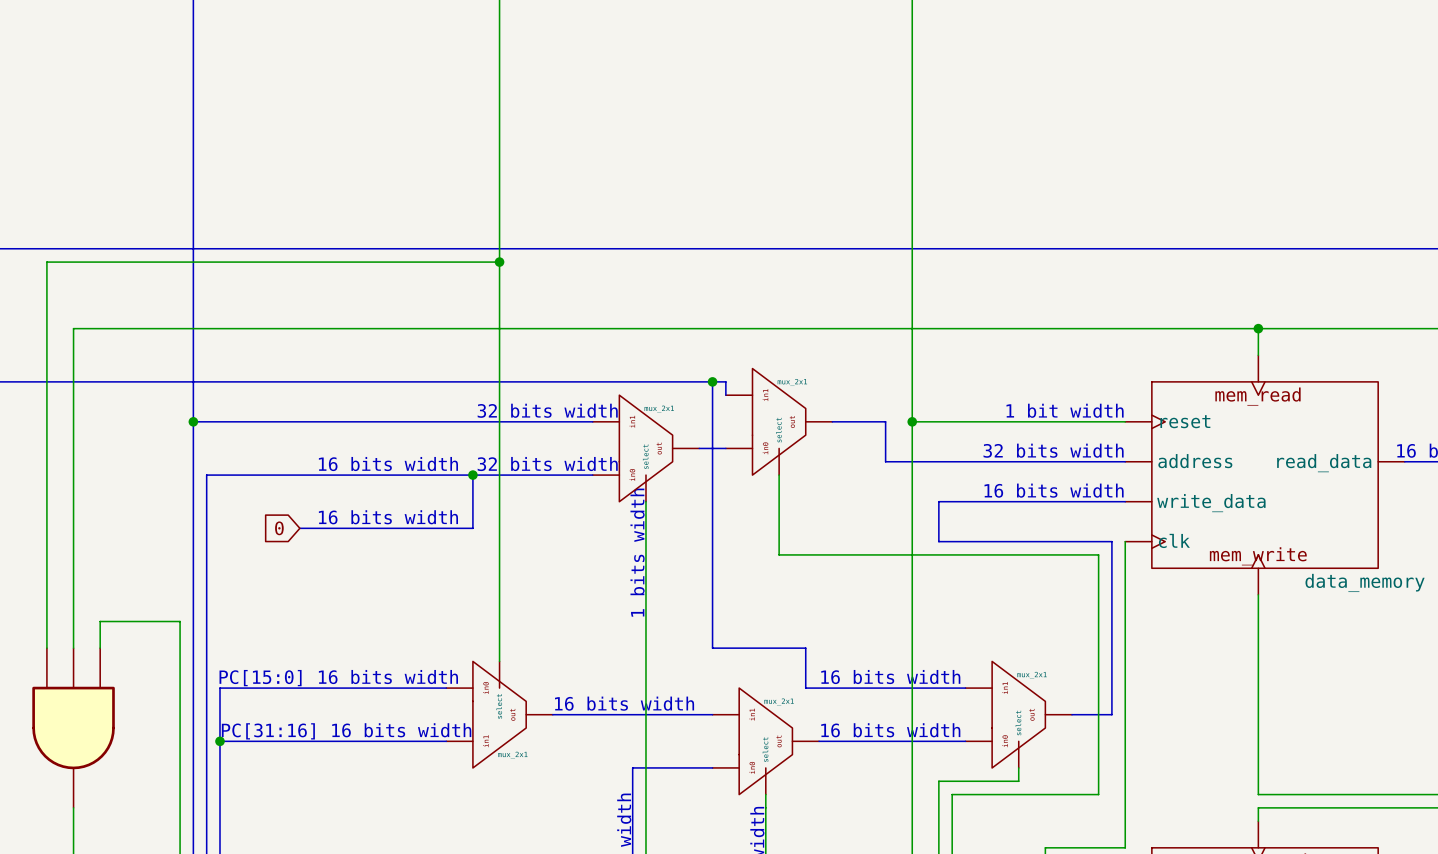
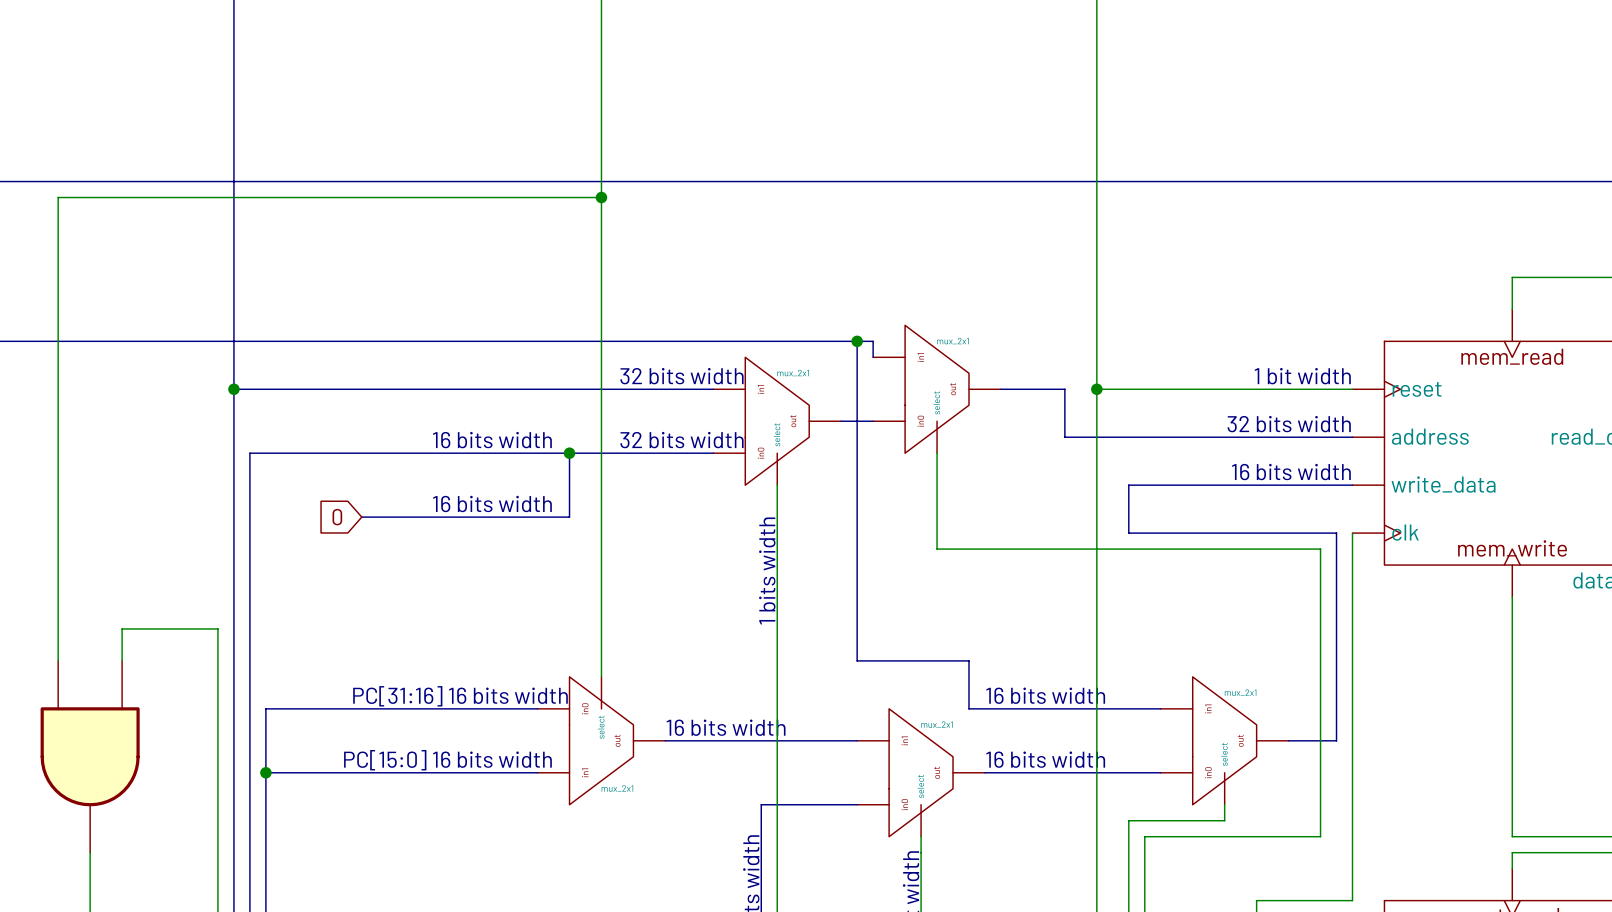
wire: (1258, 328) (73, 328) (73, 648) -> none
junction: (1258, 328) -> none
part symbol: [32, 648, 115, 808] -> [40, 660, 140, 853]
text position: PC[15:0] 16 bits width (338, 678) -> PC[15:0] 16 bits width (447, 760)
text position: PC[31:16] 16 bits width (346, 731) -> PC[31:16] 16 bits width (460, 696)

